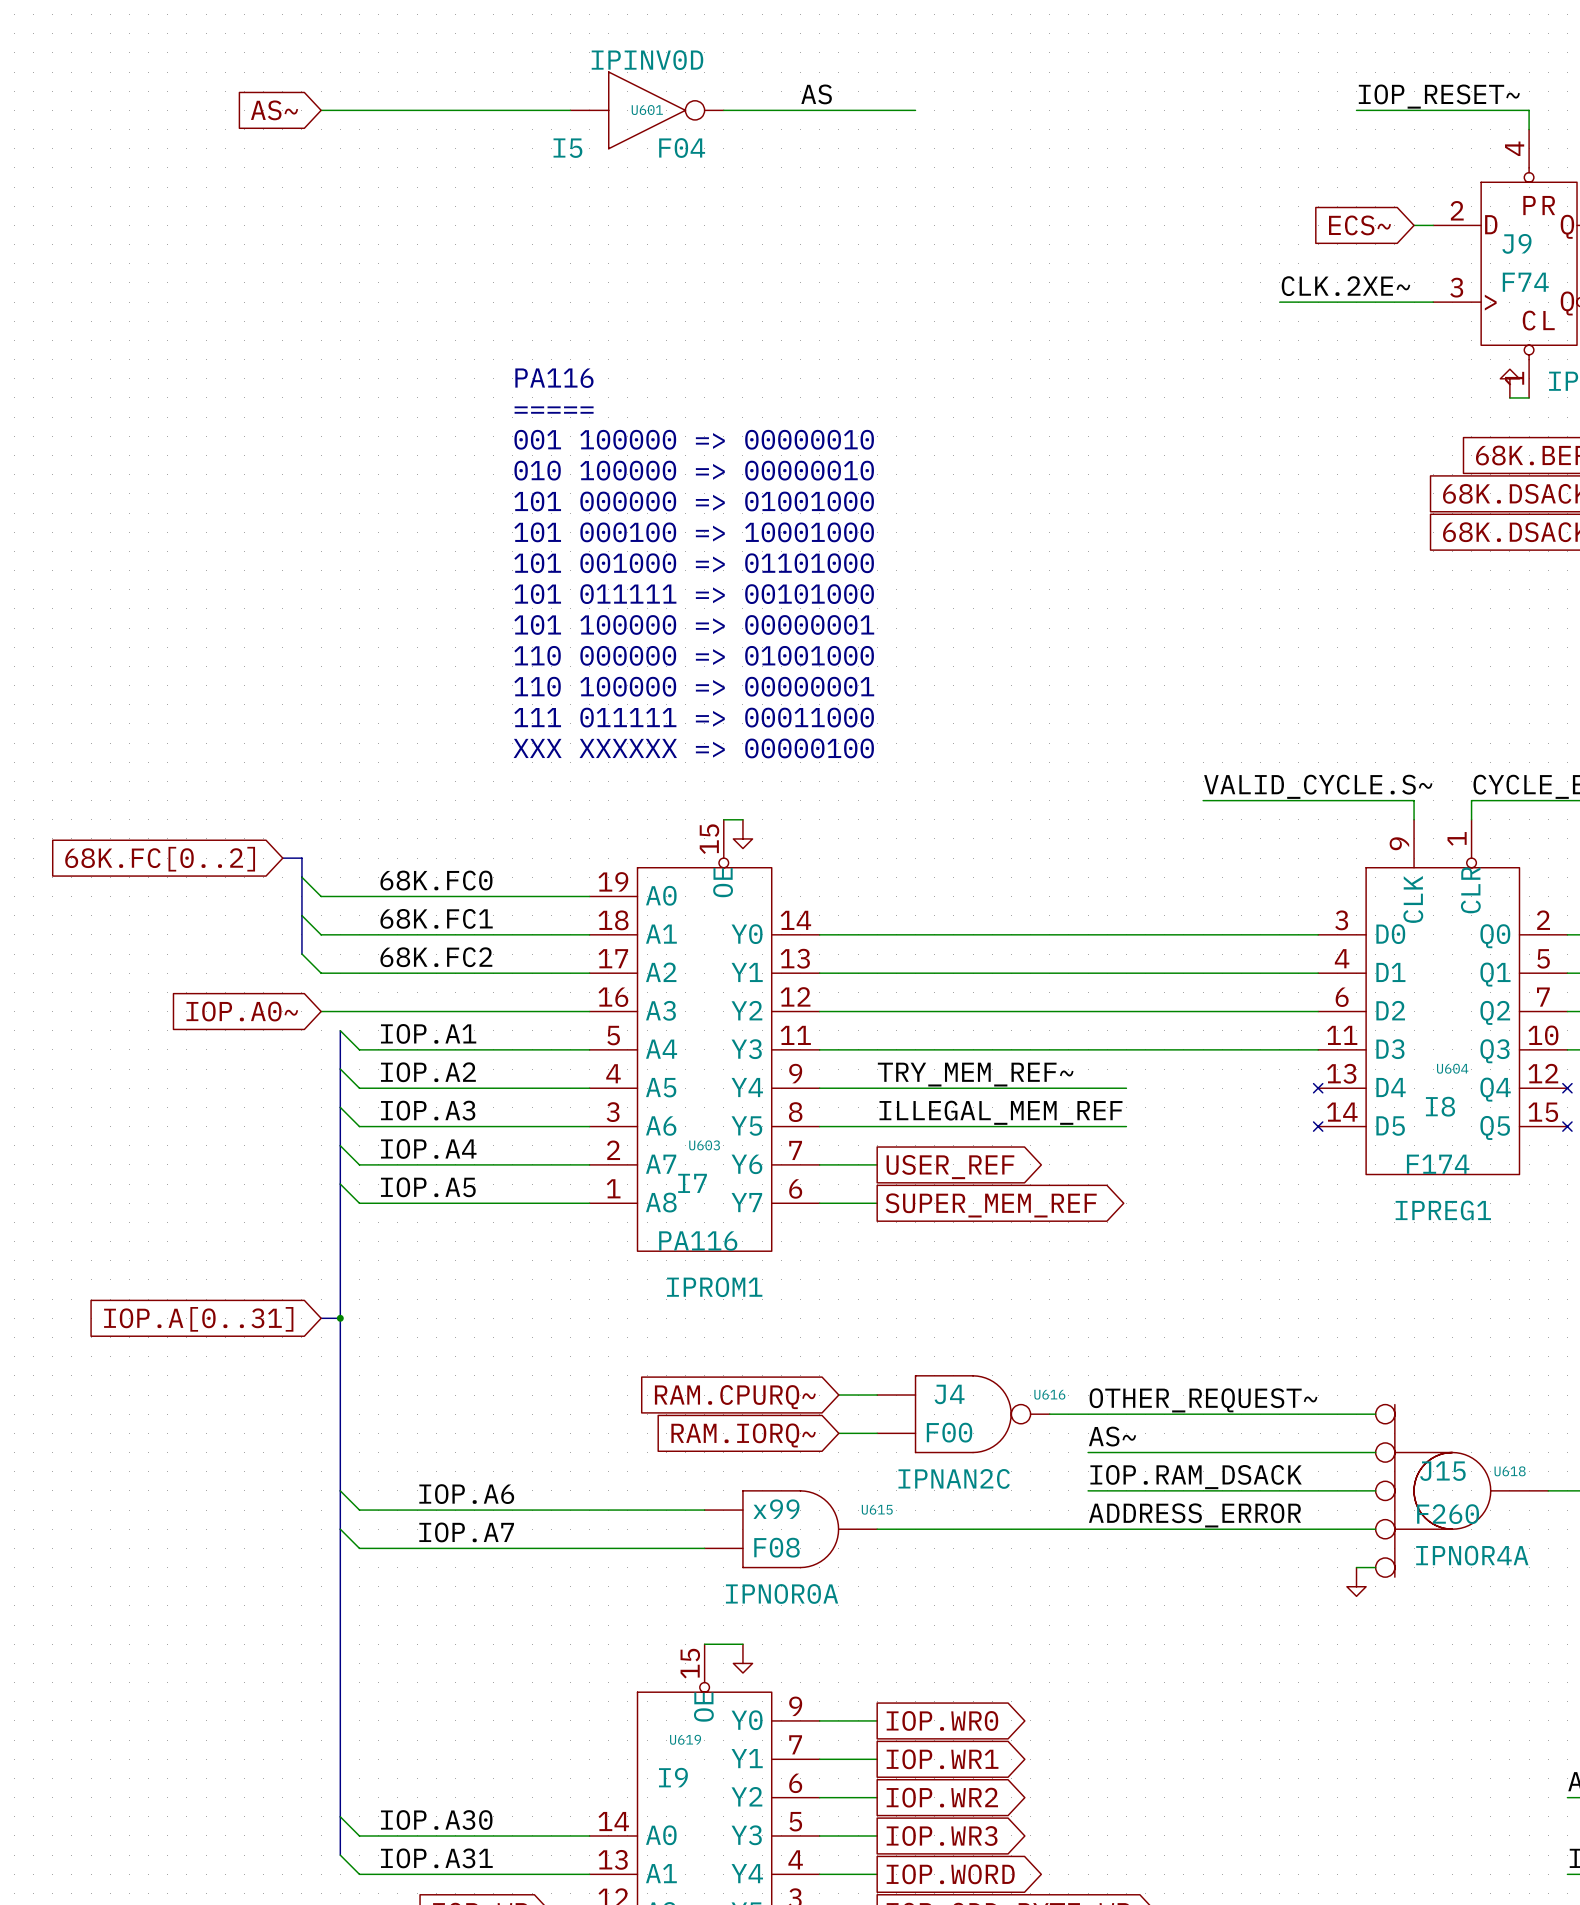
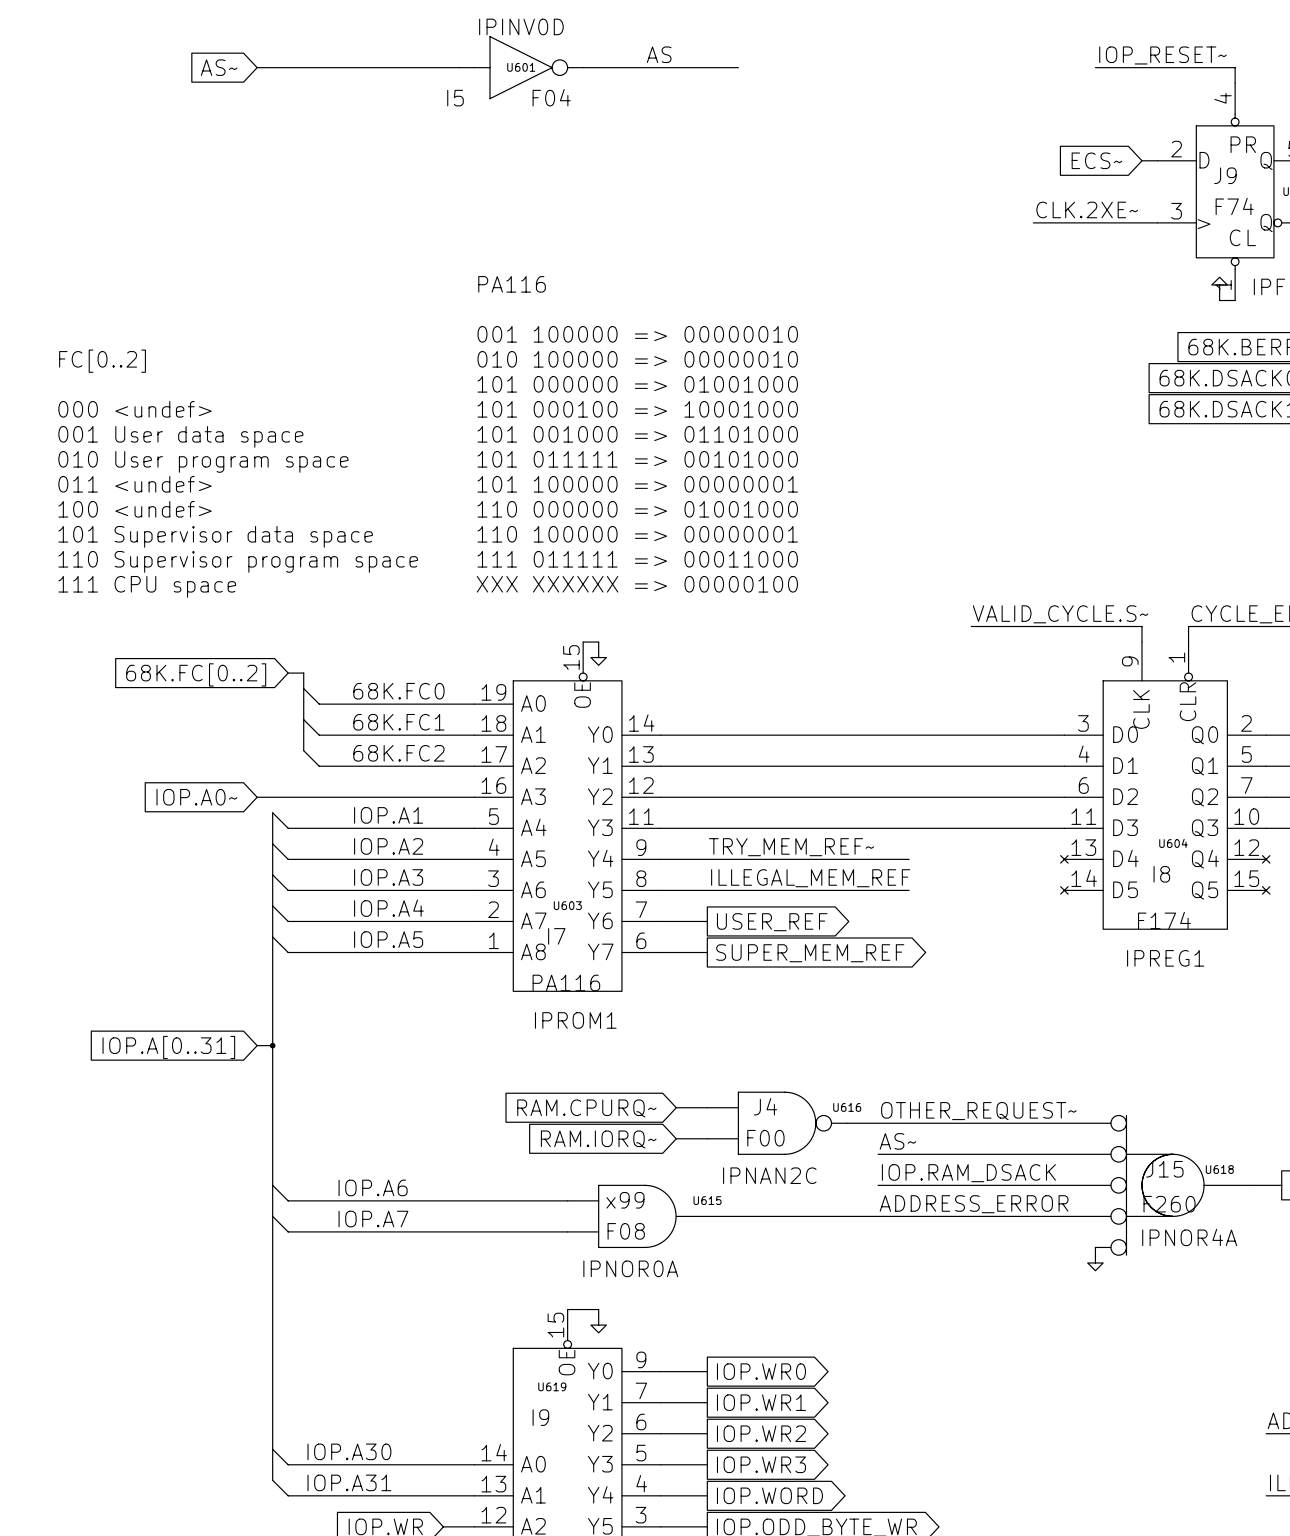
text position: PA116 (554, 378) -> PA116 (512, 284)
text: ===== (554, 410) -> none
text position: 001 100000 => 00000010 (694, 439) -> 001 100000 => 00000010 (637, 334)
text position: 010 100000 => 00000010 (694, 470) -> 010 100000 => 00000010 (637, 359)
text: none -> FC[0..2] (102, 361)
text position: 101 000000 => 01001000 (694, 501) -> 101 000000 => 01001000 (637, 384)
text: none -> 000 <undef> (135, 409)
text position: 101 000100 => 10001000 (694, 532) -> 101 000100 => 10001000 (637, 409)
text position: 101 001000 => 01101000 (694, 563) -> 101 001000 => 01101000 (637, 434)
text: none -> 001 User data space (180, 436)
text position: 101 011111 => 00101000 (694, 594) -> 101 011111 => 00101000 (637, 459)
text: none -> 010 User program space (203, 461)
text: none -> 011 <undef> (135, 484)
text position: 101 100000 => 00000001 (694, 624) -> 101 100000 => 00000001 (637, 484)
text: none -> 100 <undef> (135, 509)
text position: 110 000000 => 01001000 (694, 655) -> 110 000000 => 01001000 (637, 509)
text position: 110 100000 => 00000001 (694, 686) -> 110 100000 => 00000001 (637, 534)
text: none -> 101 Supervisor data space (215, 536)
text position: 111 011111 => 00011000 (694, 717) -> 111 011111 => 00011000 (637, 559)
text: none -> 110 Supervisor program space (238, 561)
text position: XXX XXXXXX => 00000100 (693, 748) -> XXX XXXXXX => 00000100 (637, 584)
text: none -> 111 CPU space (147, 586)
bus: (282, 858) (301, 858) (301, 954) -> (288, 673) (303, 673) (303, 750)
global label position: 68K.FC[0..2] (160, 859) -> 68K.FC[0..2] (196, 674)
wire: (301, 877) (321, 896) (397, 896) -> (303, 688) (319, 704)
label position: 68K.FC0 (436, 880) -> 68K.FC0 (398, 691)
wire: (301, 915) (321, 934) (397, 934) -> (303, 719) (319, 735)
label position: 68K.FC1 (436, 918) -> 68K.FC1 (398, 722)
wire: (301, 954) (321, 973) (397, 973) -> (303, 750) (319, 766)
label position: 68K.FC2 (436, 957) -> 68K.FC2 (398, 753)
label position: IOP.A1 (428, 1033) -> IOP.A1 (388, 815)
label position: IOP.A2 (428, 1072) -> IOP.A2 (388, 846)
label position: IOP.A3 (428, 1110) -> IOP.A3 (388, 877)
label position: IOP.A4 (428, 1148) -> IOP.A4 (388, 908)
label position: IOP.A5 (428, 1187) -> IOP.A5 (388, 939)

